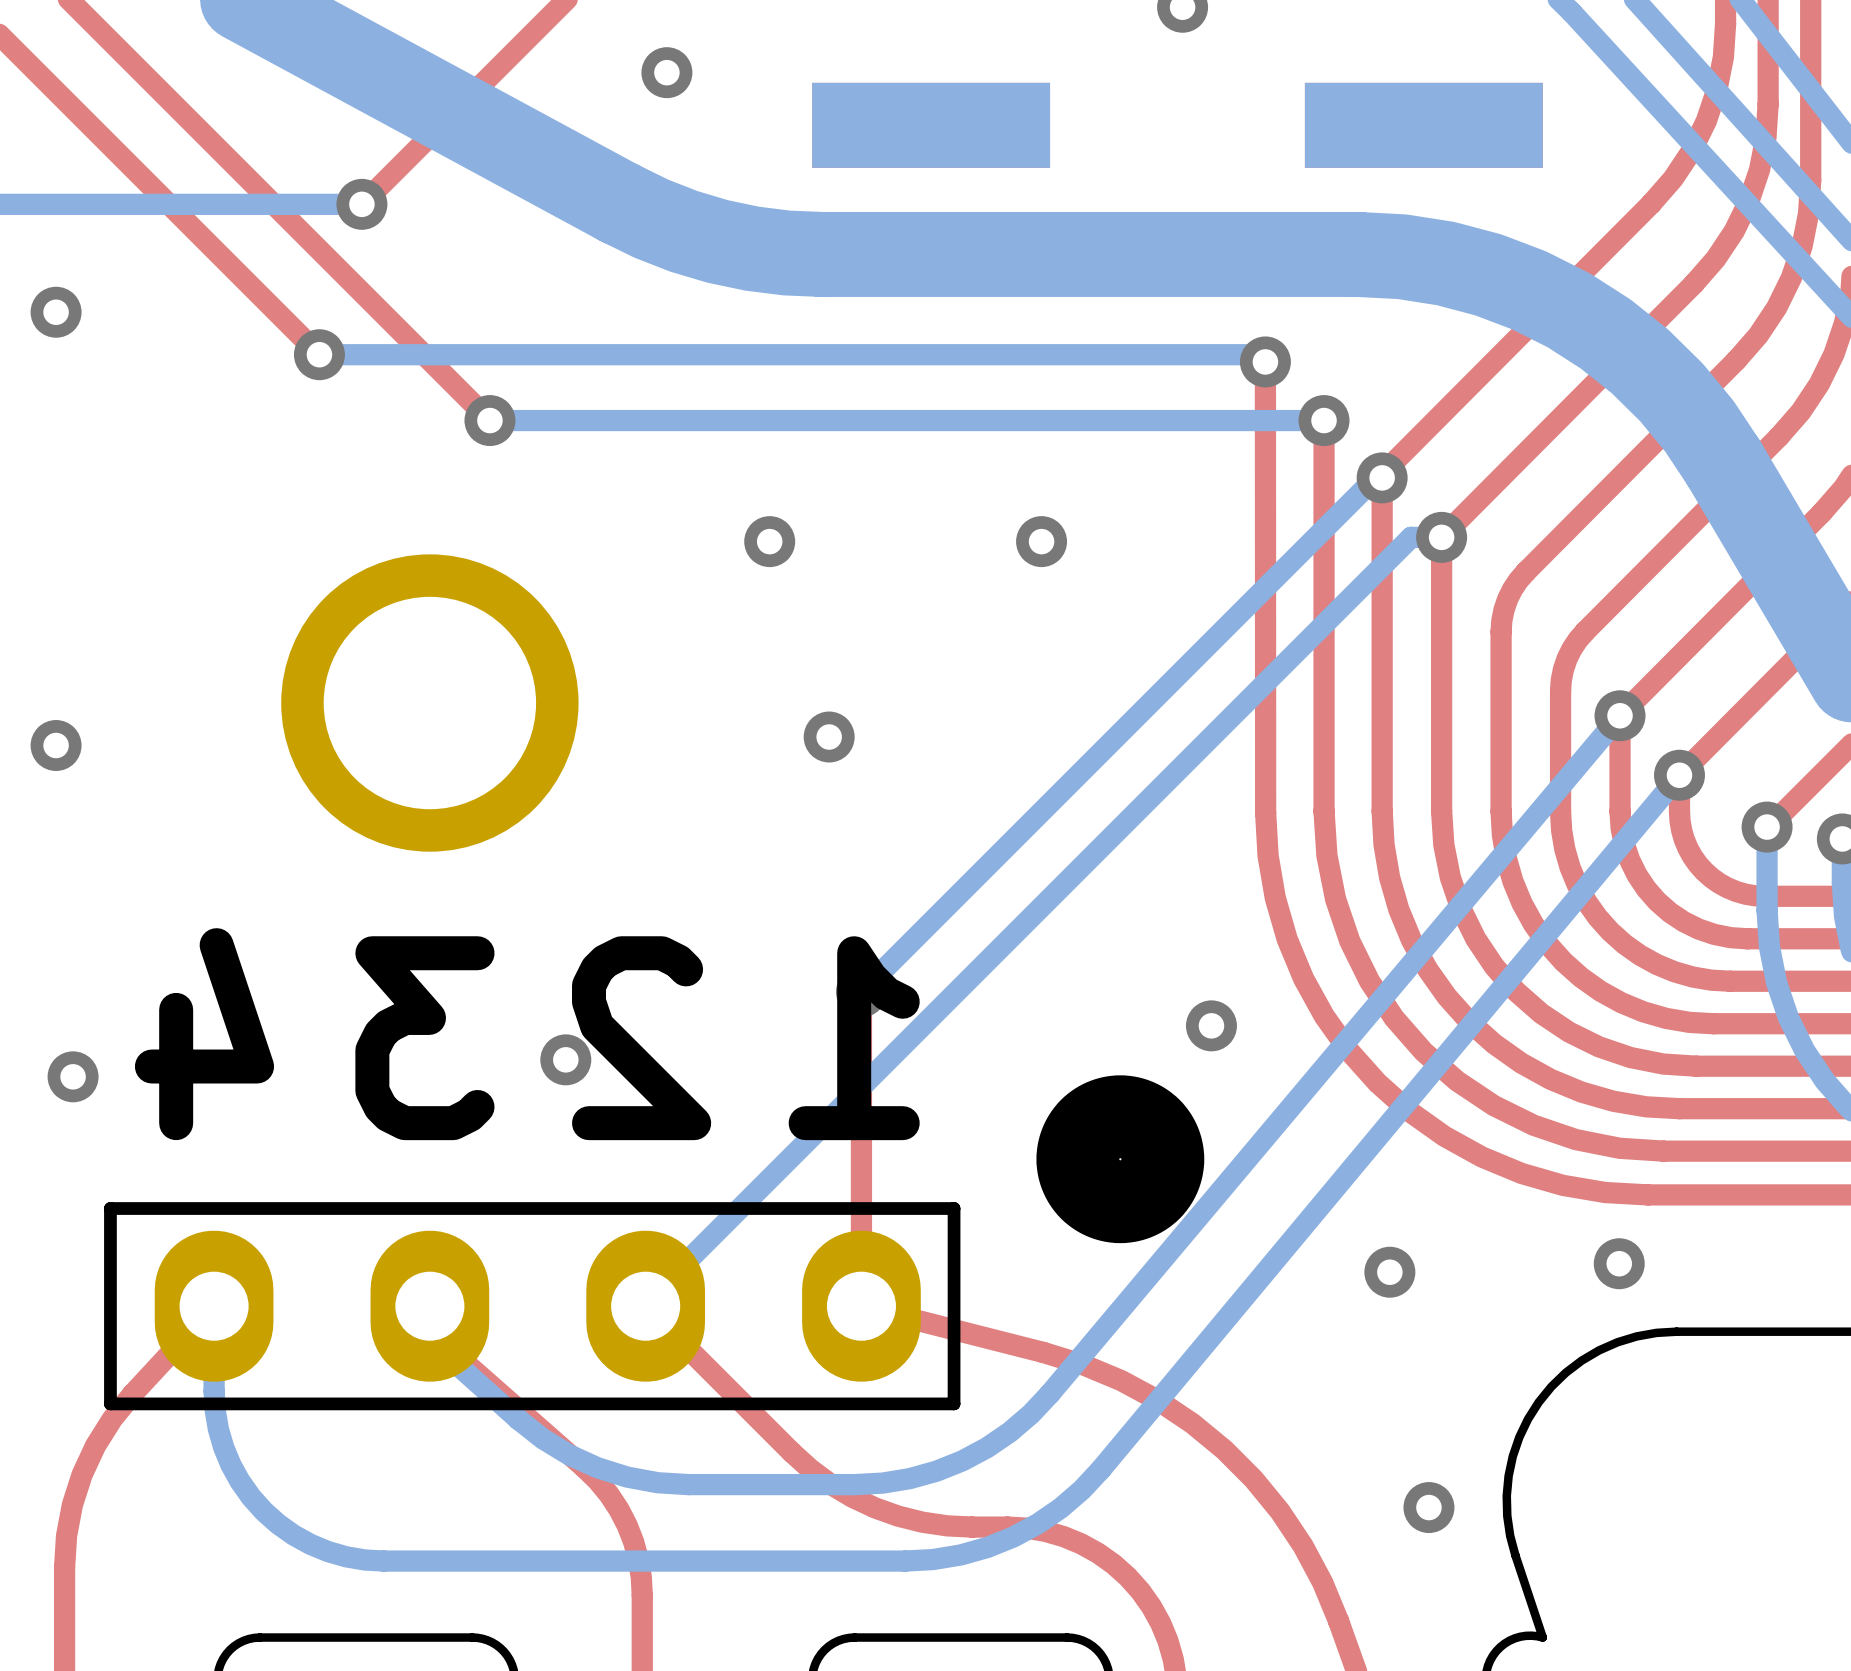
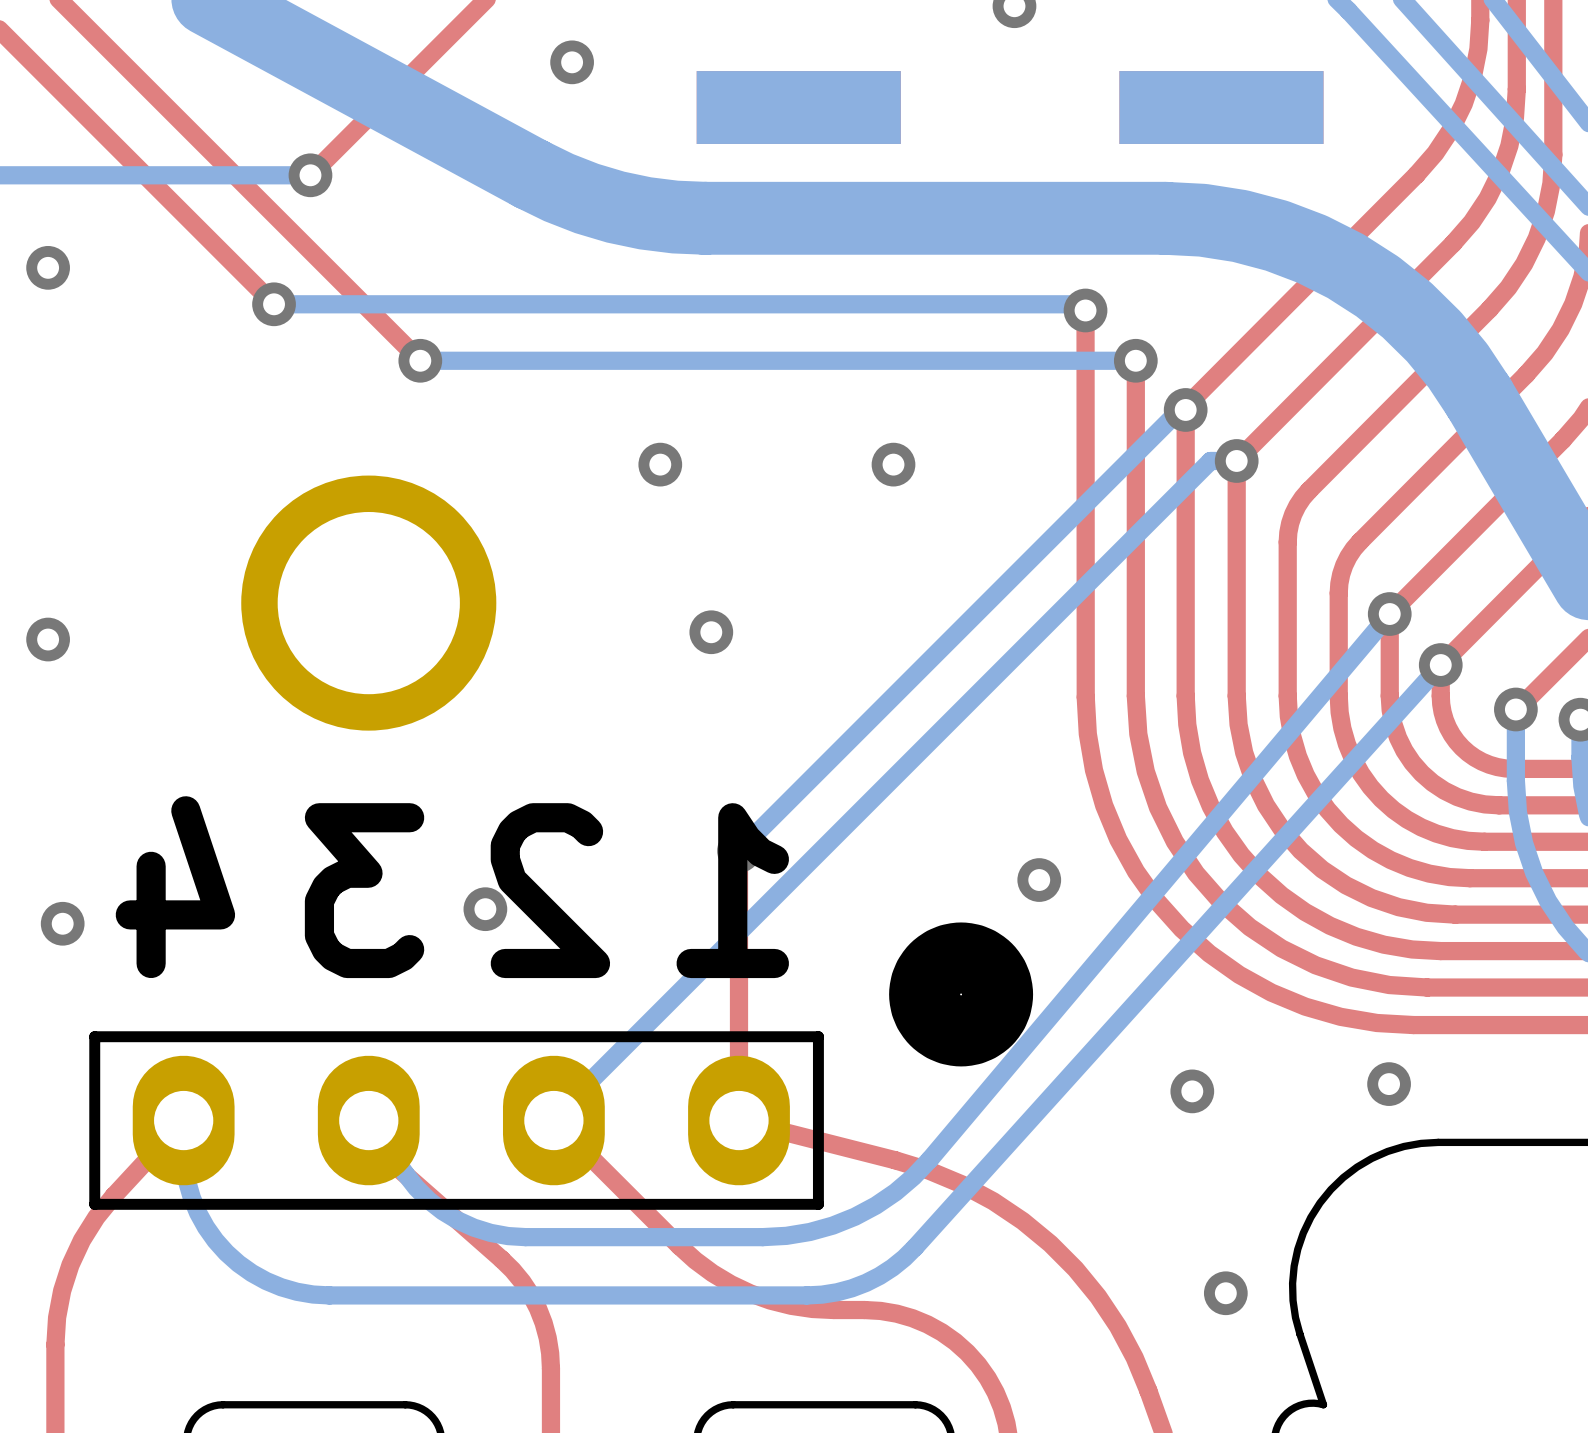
bottom track: (1620, 715) (1049, 1393) (1030, 1414) (1009, 1432) (986, 1447) (962, 1460) (936, 1471) (910, 1478) (882, 1483) (854, 1484) (688, 1484) (657, 1482) (627, 1477) (597, 1467) (569, 1455) (543, 1438) (429, 1340) -> (1389, 614) (929, 1159) (895, 1192) (854, 1216) (809, 1231) (762, 1237) (525, 1237) (490, 1232) (457, 1220) (428, 1200) (405, 1173) (368, 1120)
bottom track: (1679, 775) (1100, 1469) (1081, 1489) (1060, 1508) (1037, 1523) (1013, 1537) (987, 1547) (960, 1554) (933, 1559) (905, 1561) (384, 1561) (346, 1556) (310, 1544) (293, 1535) (263, 1511) (240, 1481) (230, 1464) (218, 1428) (214, 1391) (214, 1340) -> (1440, 665) (915, 1247) (892, 1267) (866, 1282) (837, 1292) (806, 1295) (329, 1295) (296, 1291) (281, 1287) (251, 1273) (238, 1263) (215, 1240) (198, 1212) (191, 1197) (184, 1166) (183, 1149)

